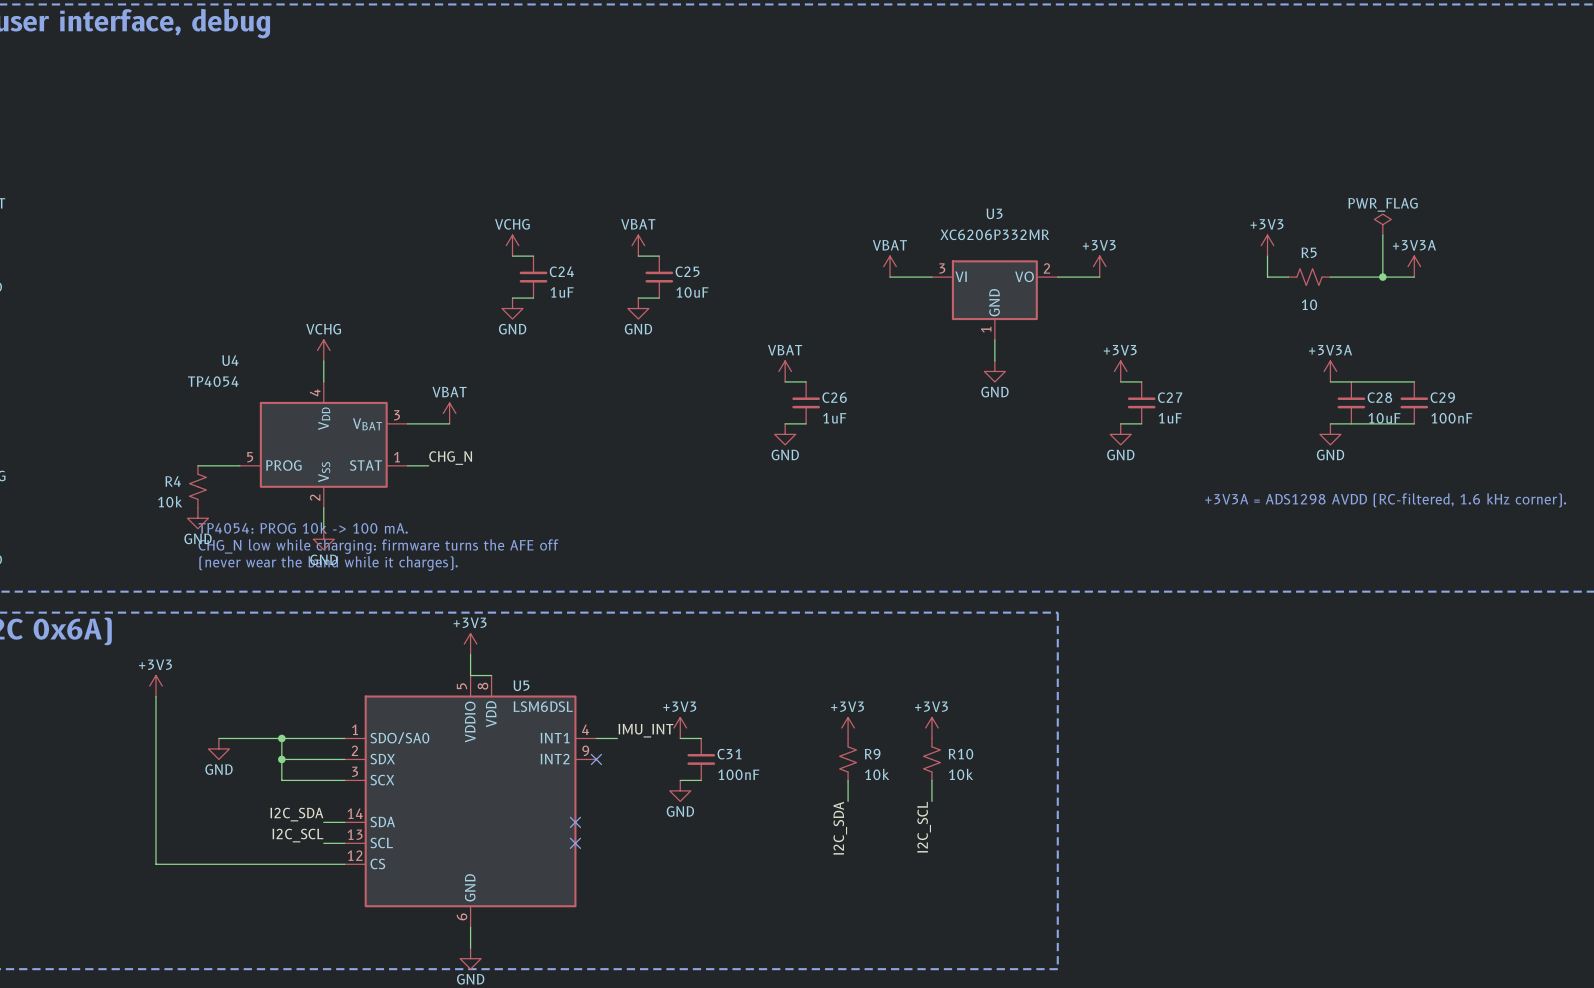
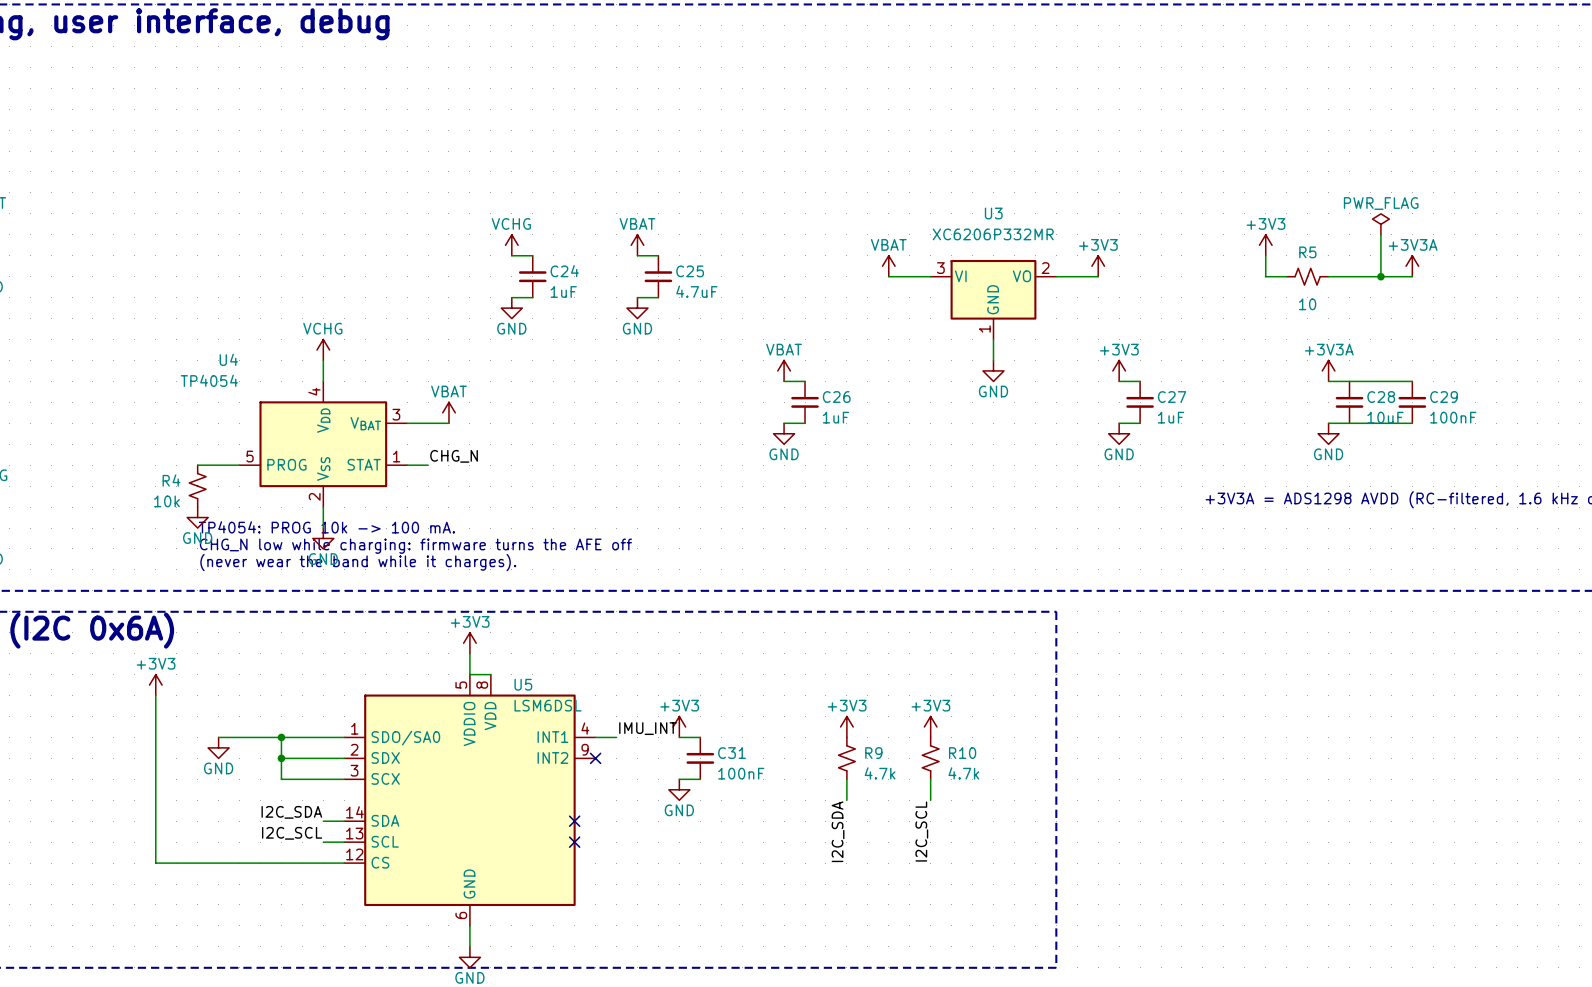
C25 value: 10uF (692, 292) -> 4.7uF (696, 291)
R9 value: 10k (877, 774) -> 4.7k (880, 773)
R10 value: 10k (961, 774) -> 4.7k (963, 773)

